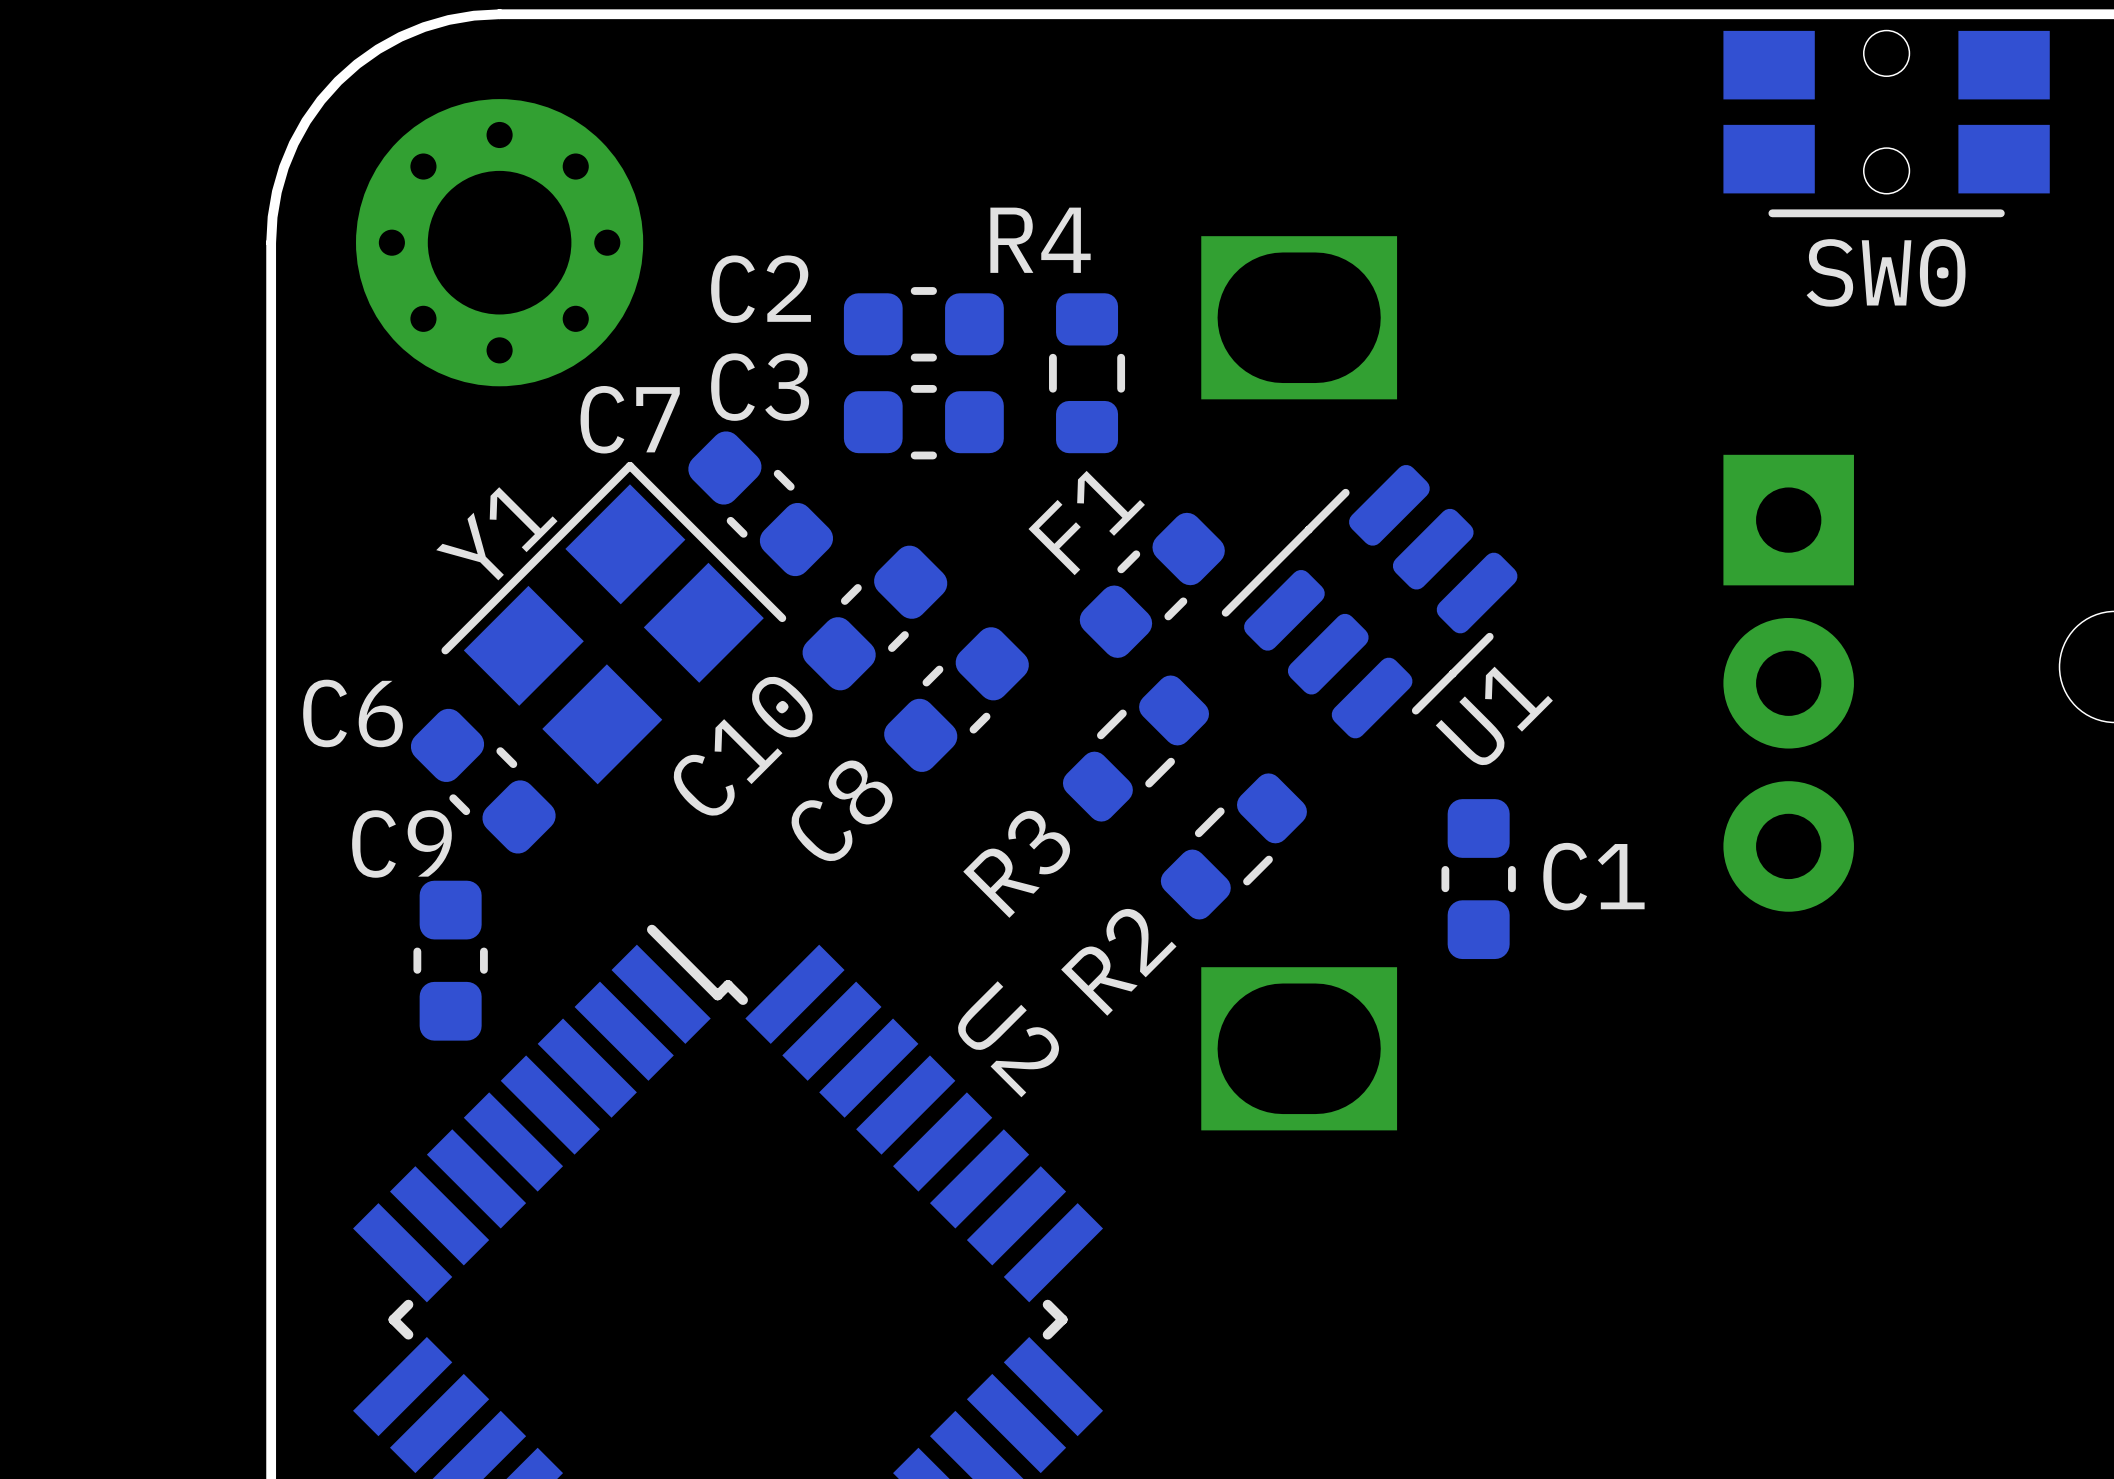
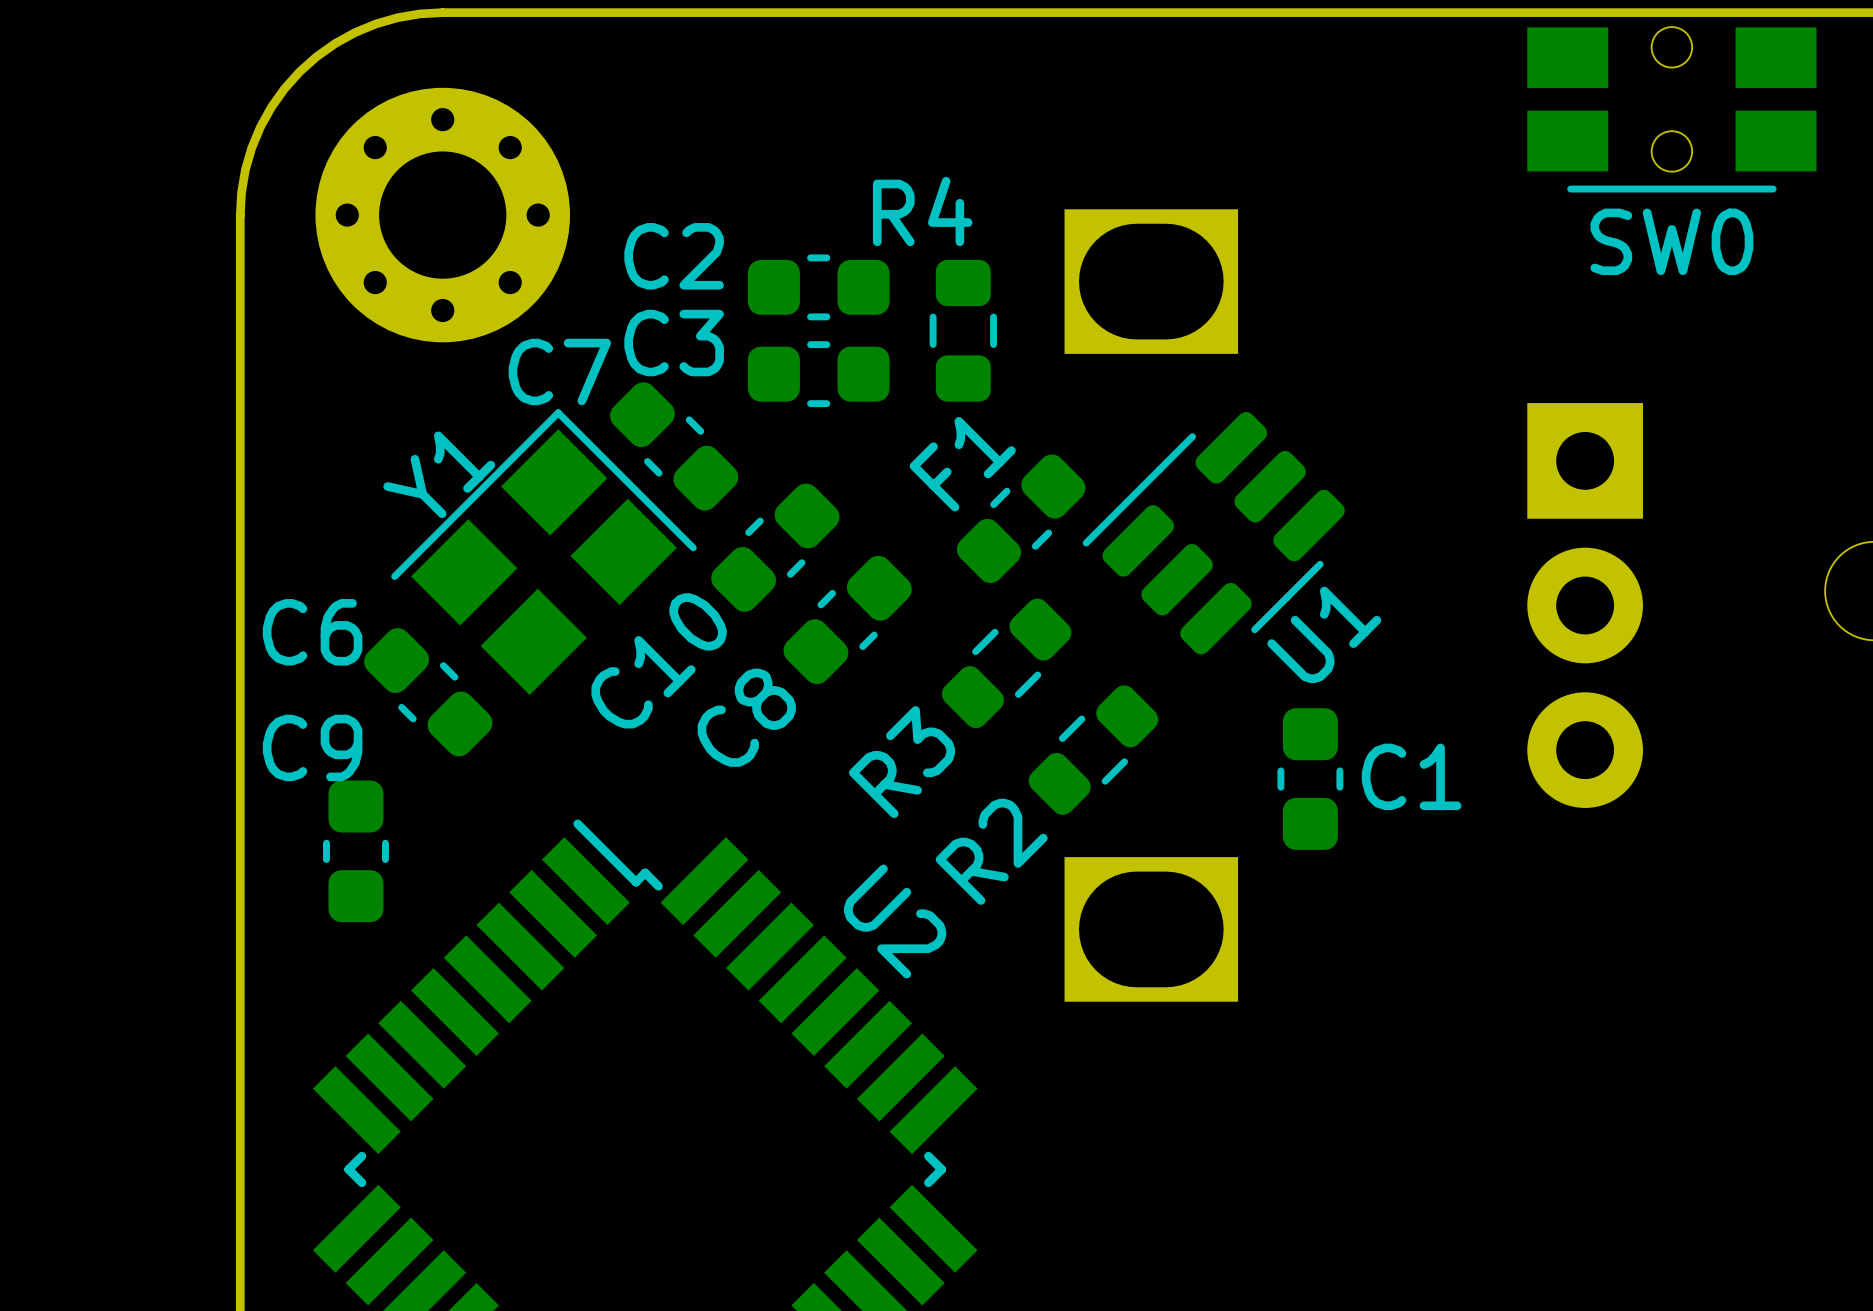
C9 position: (450, 960) -> (355, 851)

